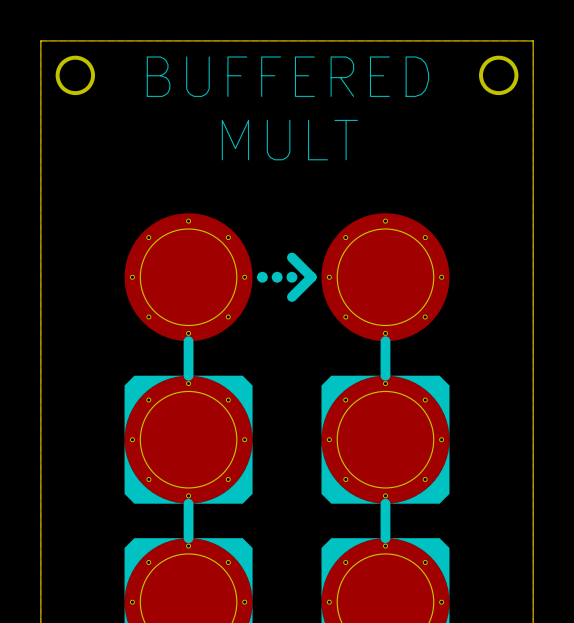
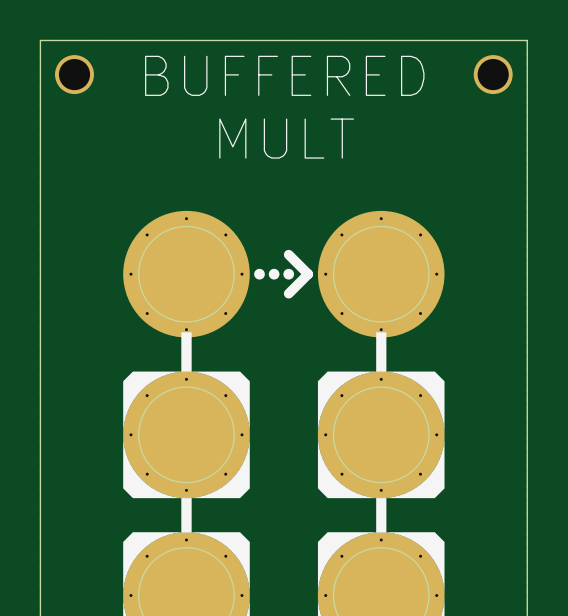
drawing: none -> [181, 332, 192, 372]
drawing: none -> [376, 332, 387, 372]
line: (188, 341) (188, 375) -> none
line: (385, 341) (385, 375) -> none
drawing: none -> [181, 497, 192, 533]
line: (188, 503) (188, 538) -> none
drawing: none -> [376, 497, 387, 533]
line: (385, 503) (385, 538) -> none

